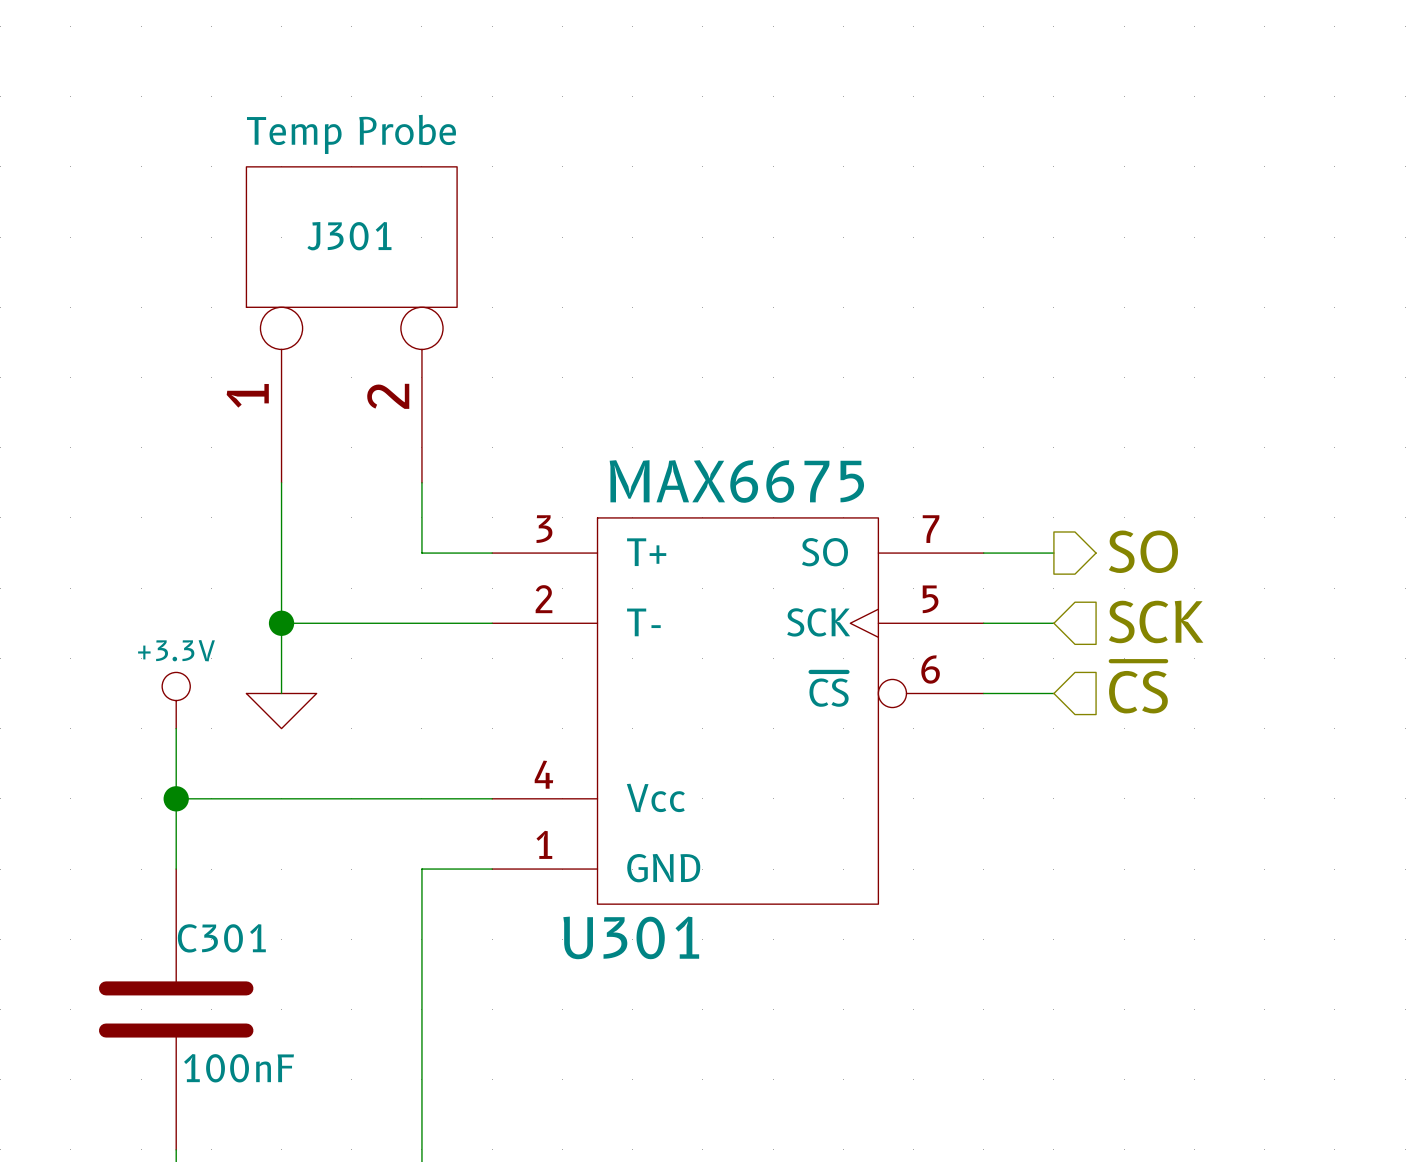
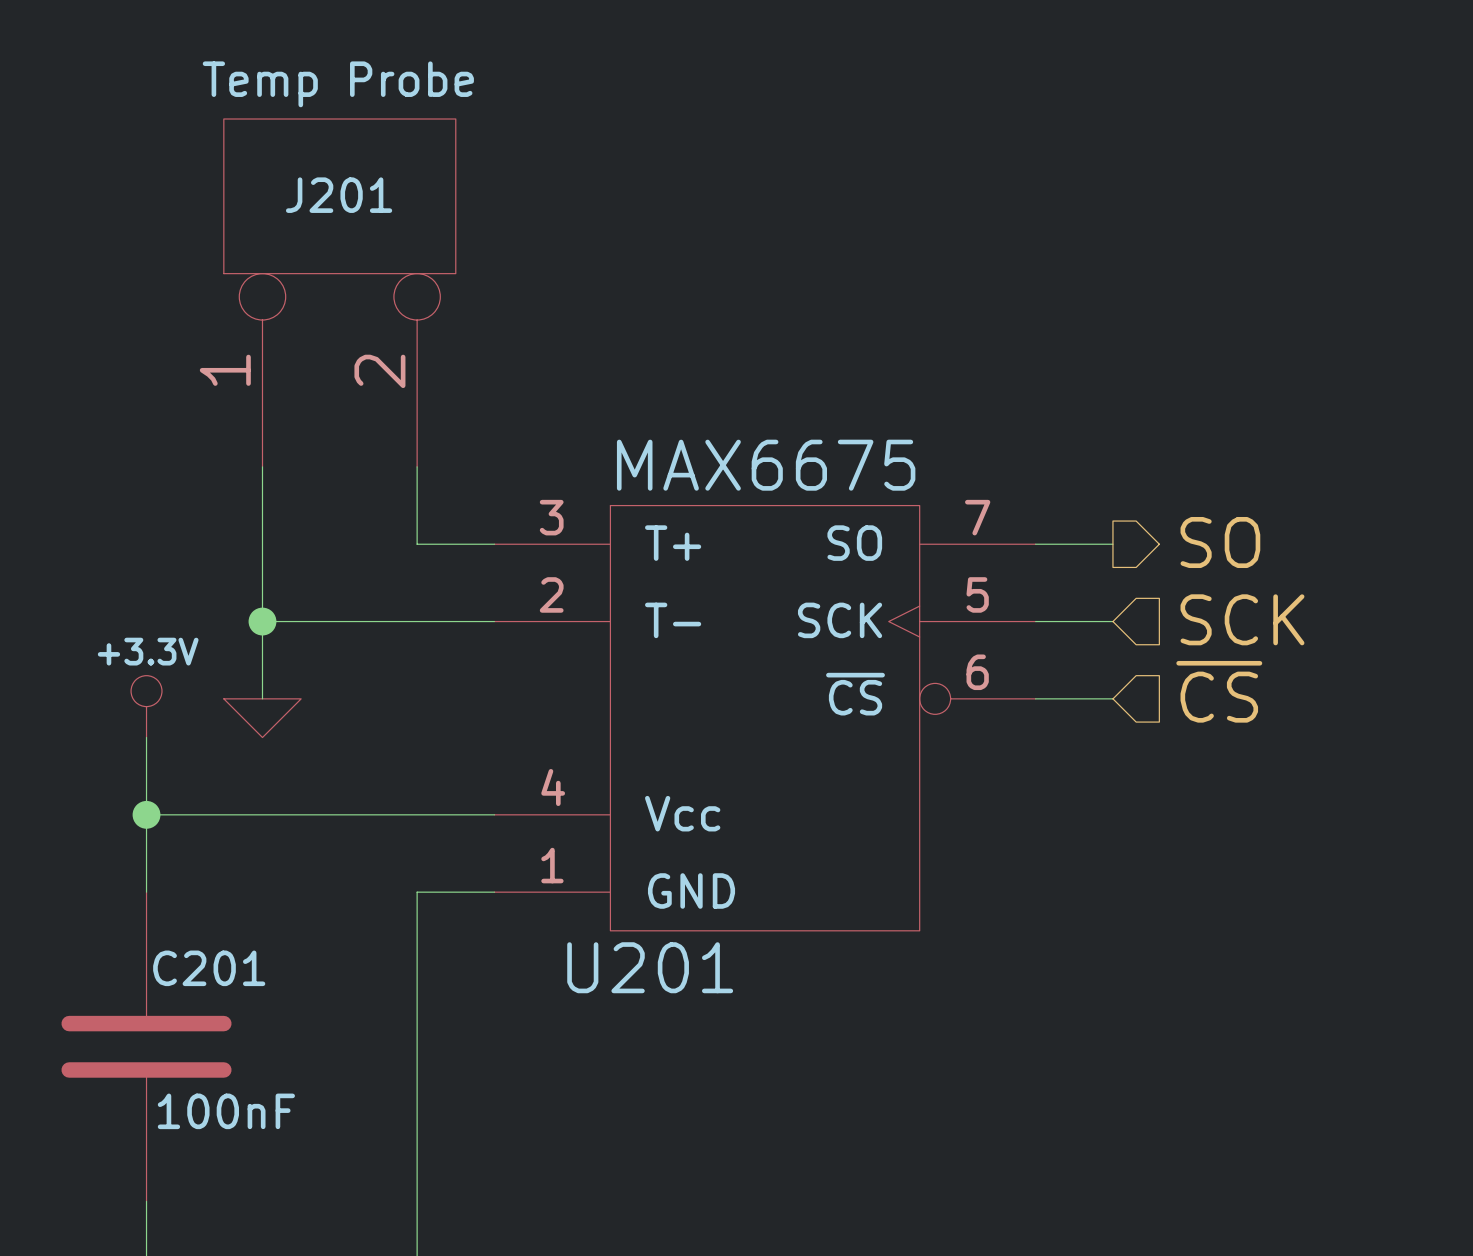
J301 name: J301 (349, 236) -> J201 (339, 195)
U301 name: U301 (631, 937) -> U201 (650, 967)
C301 name: C301 (221, 938) -> C201 (209, 968)

